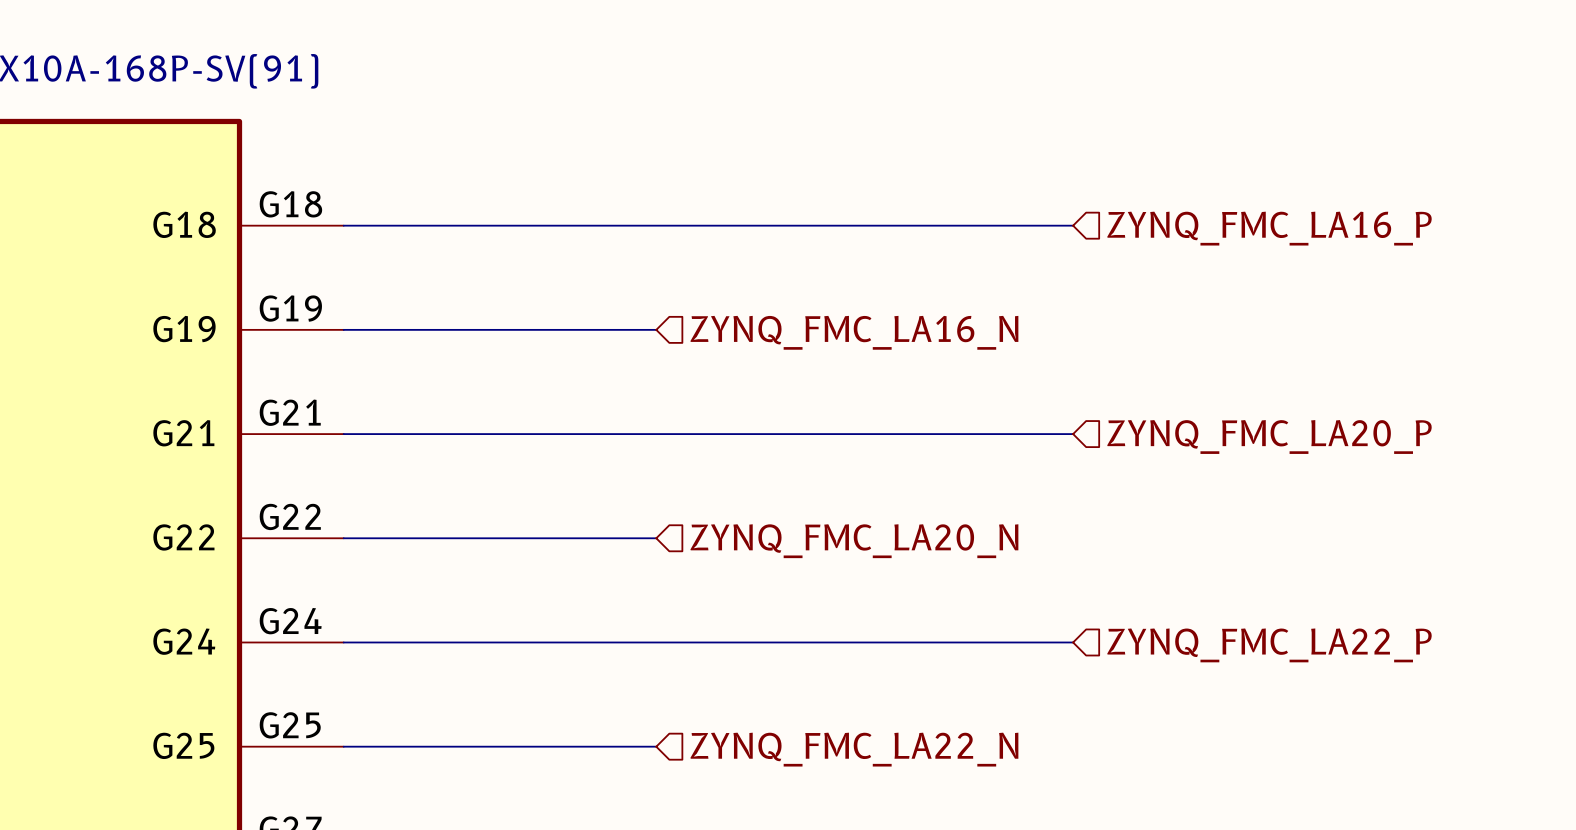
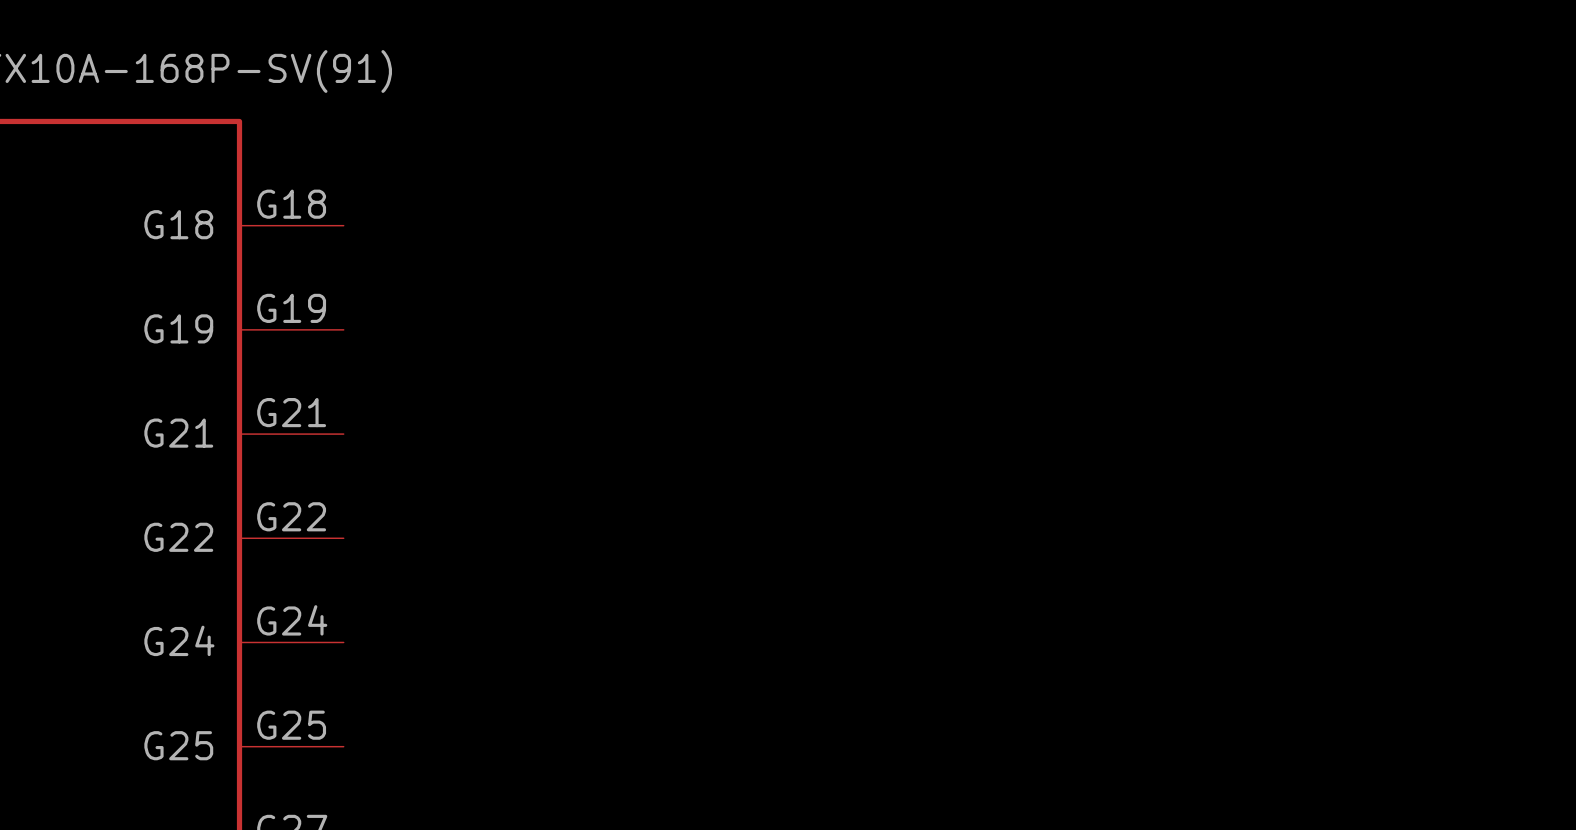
wire: (343, 225) (1073, 225) -> none
hierarchical label: ZYNQ_FMC_LA16_P (1269, 228) -> none
wire: (343, 329) (656, 329) -> none
hierarchical label: ZYNQ_FMC_LA16_N (854, 332) -> none
wire: (343, 434) (1073, 434) -> none
hierarchical label: ZYNQ_FMC_LA20_P (1269, 437) -> none
wire: (343, 538) (656, 538) -> none
hierarchical label: ZYNQ_FMC_LA20_N (854, 541) -> none
wire: (343, 642) (1073, 642) -> none
hierarchical label: ZYNQ_FMC_LA22_P (1269, 645) -> none
wire: (343, 746) (656, 746) -> none
hierarchical label: ZYNQ_FMC_LA22_N (854, 749) -> none

